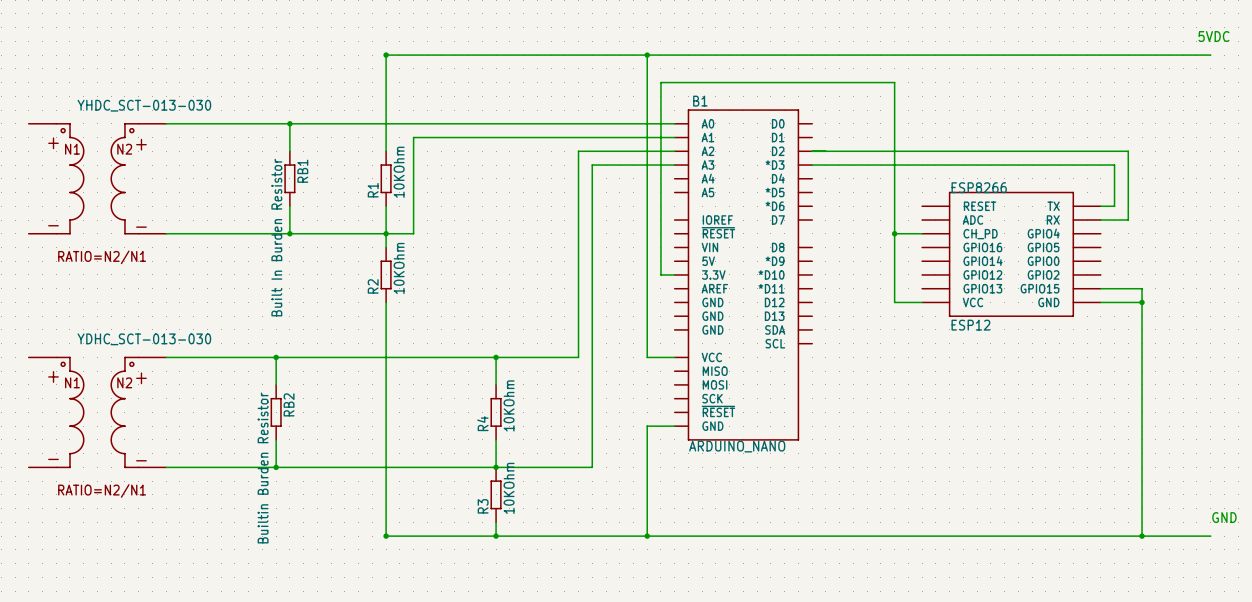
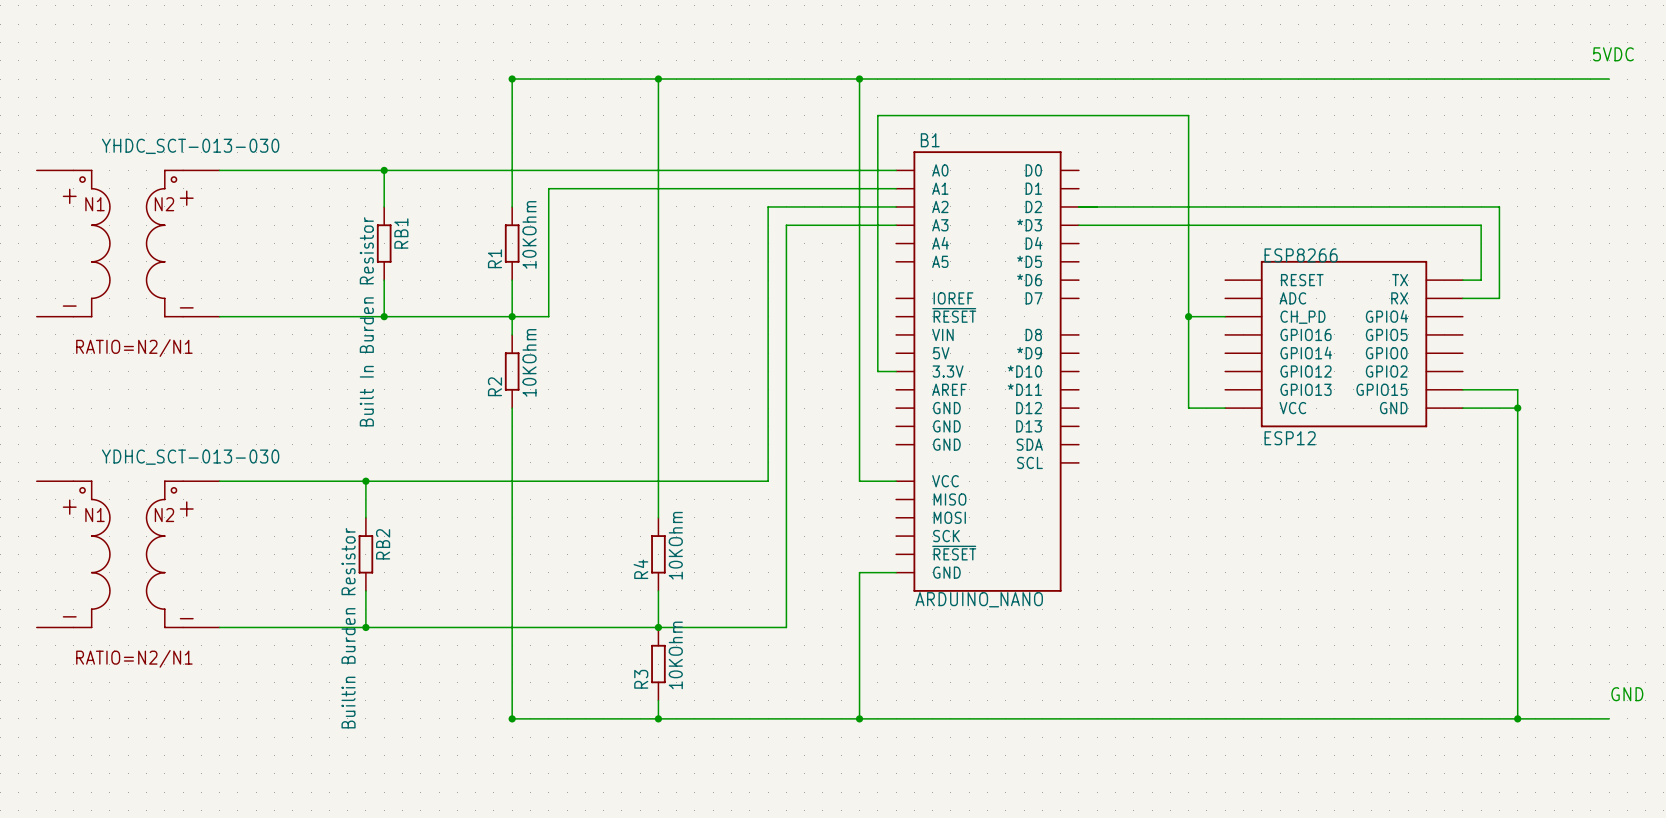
wire: none -> (658, 79) (658, 481)
junction: none -> (658, 79)
junction: (496, 357) -> none

